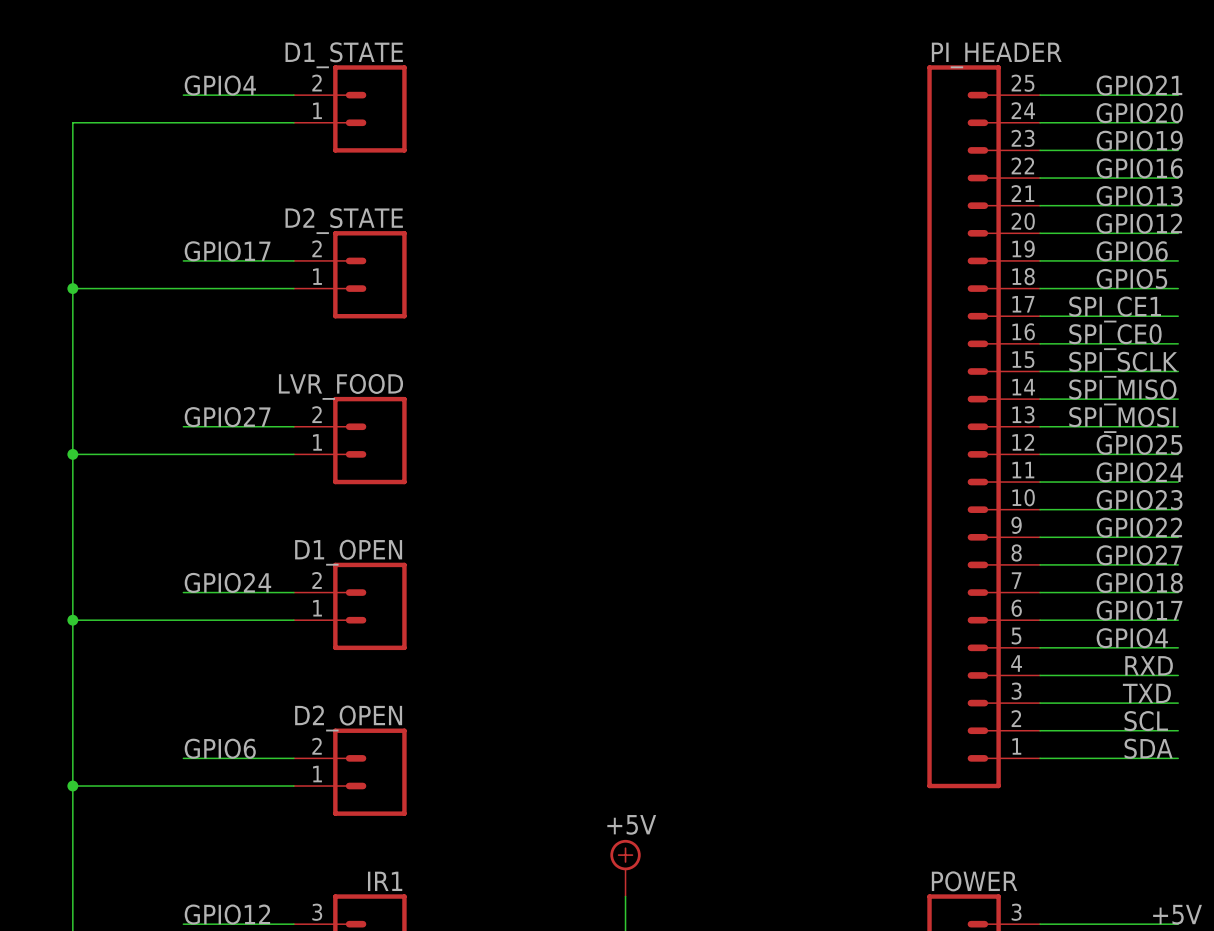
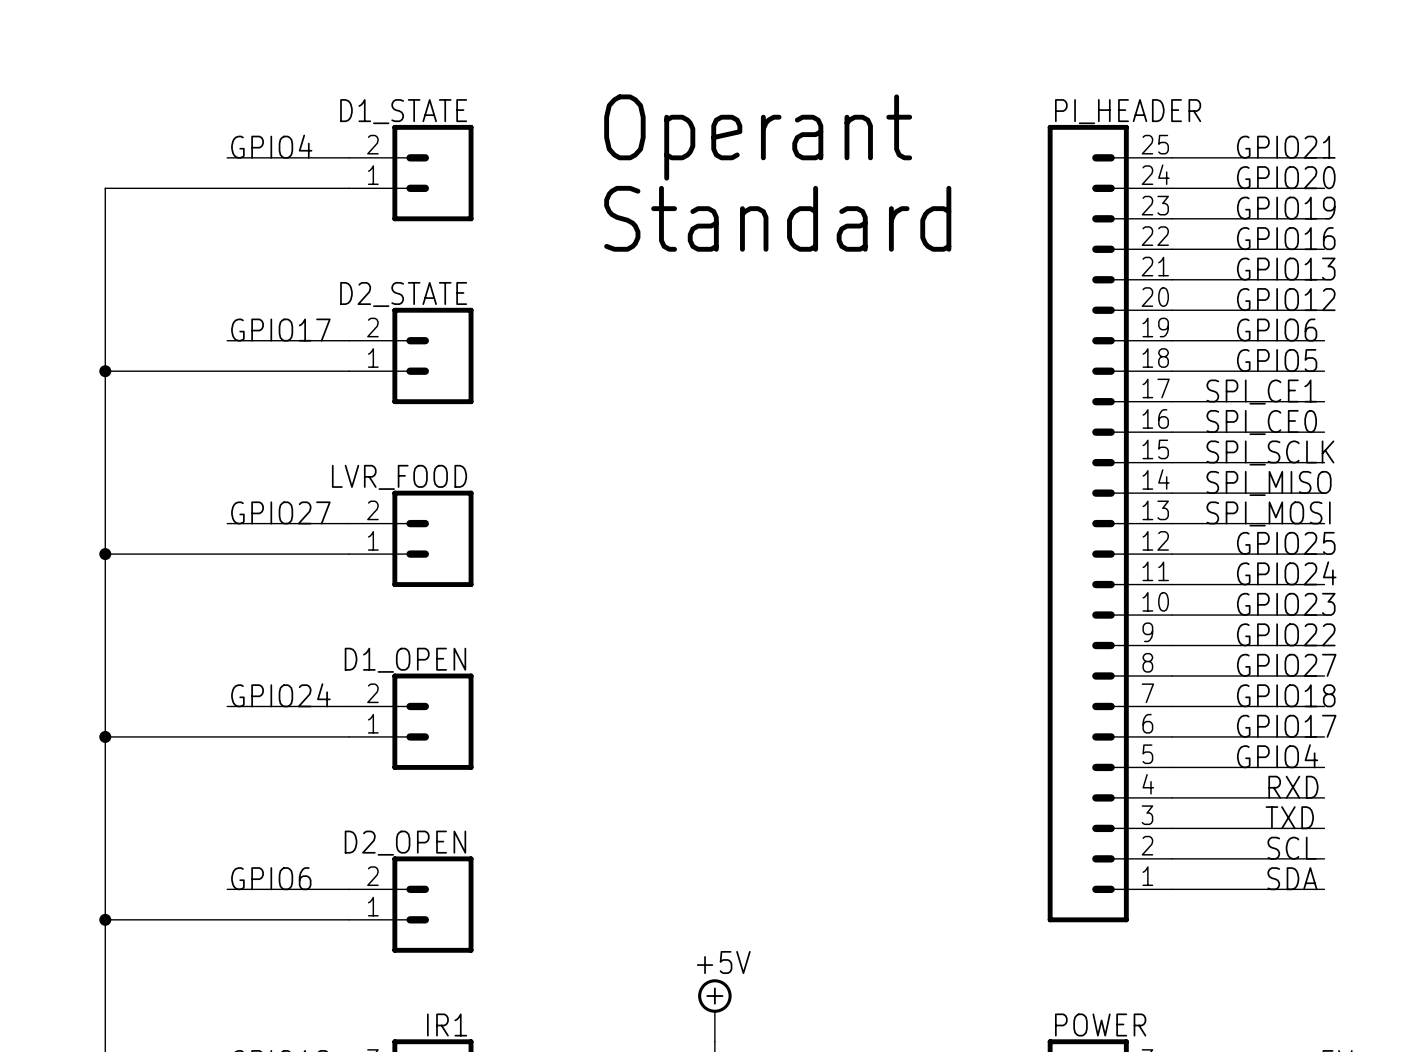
text: none -> Operant (758, 137)
text: none -> Standard (777, 218)

